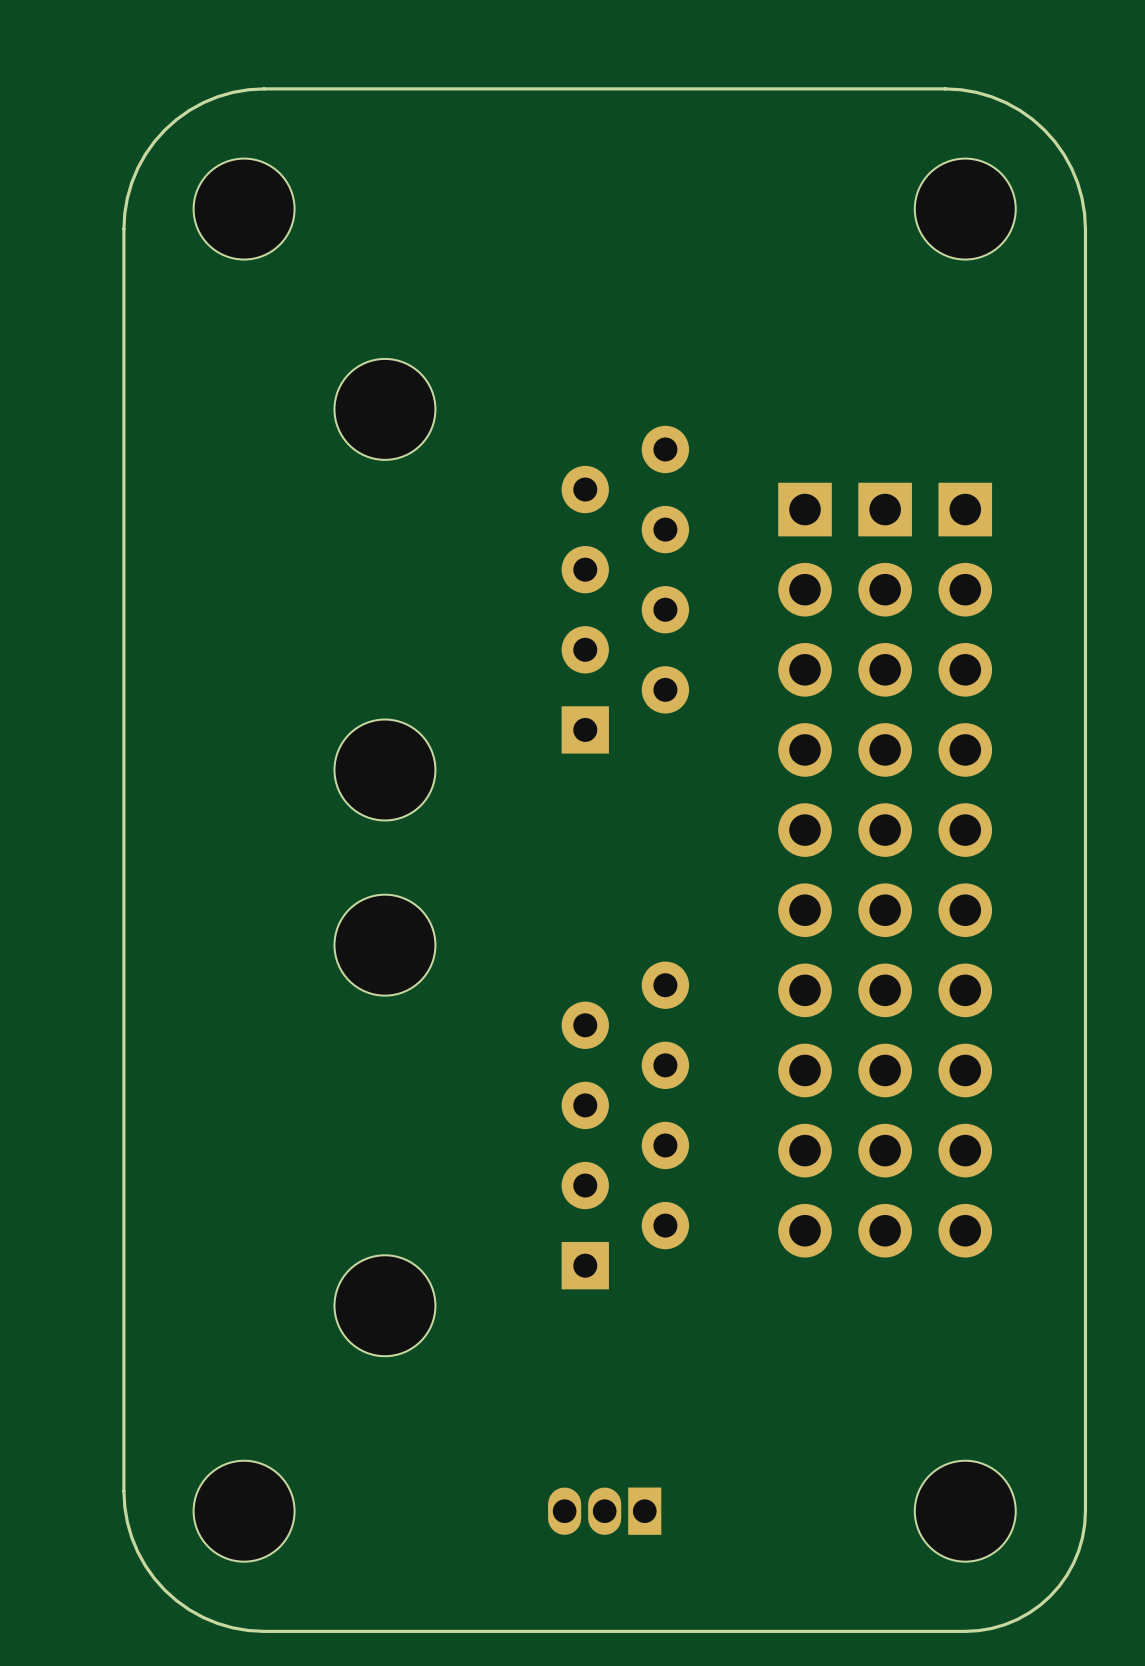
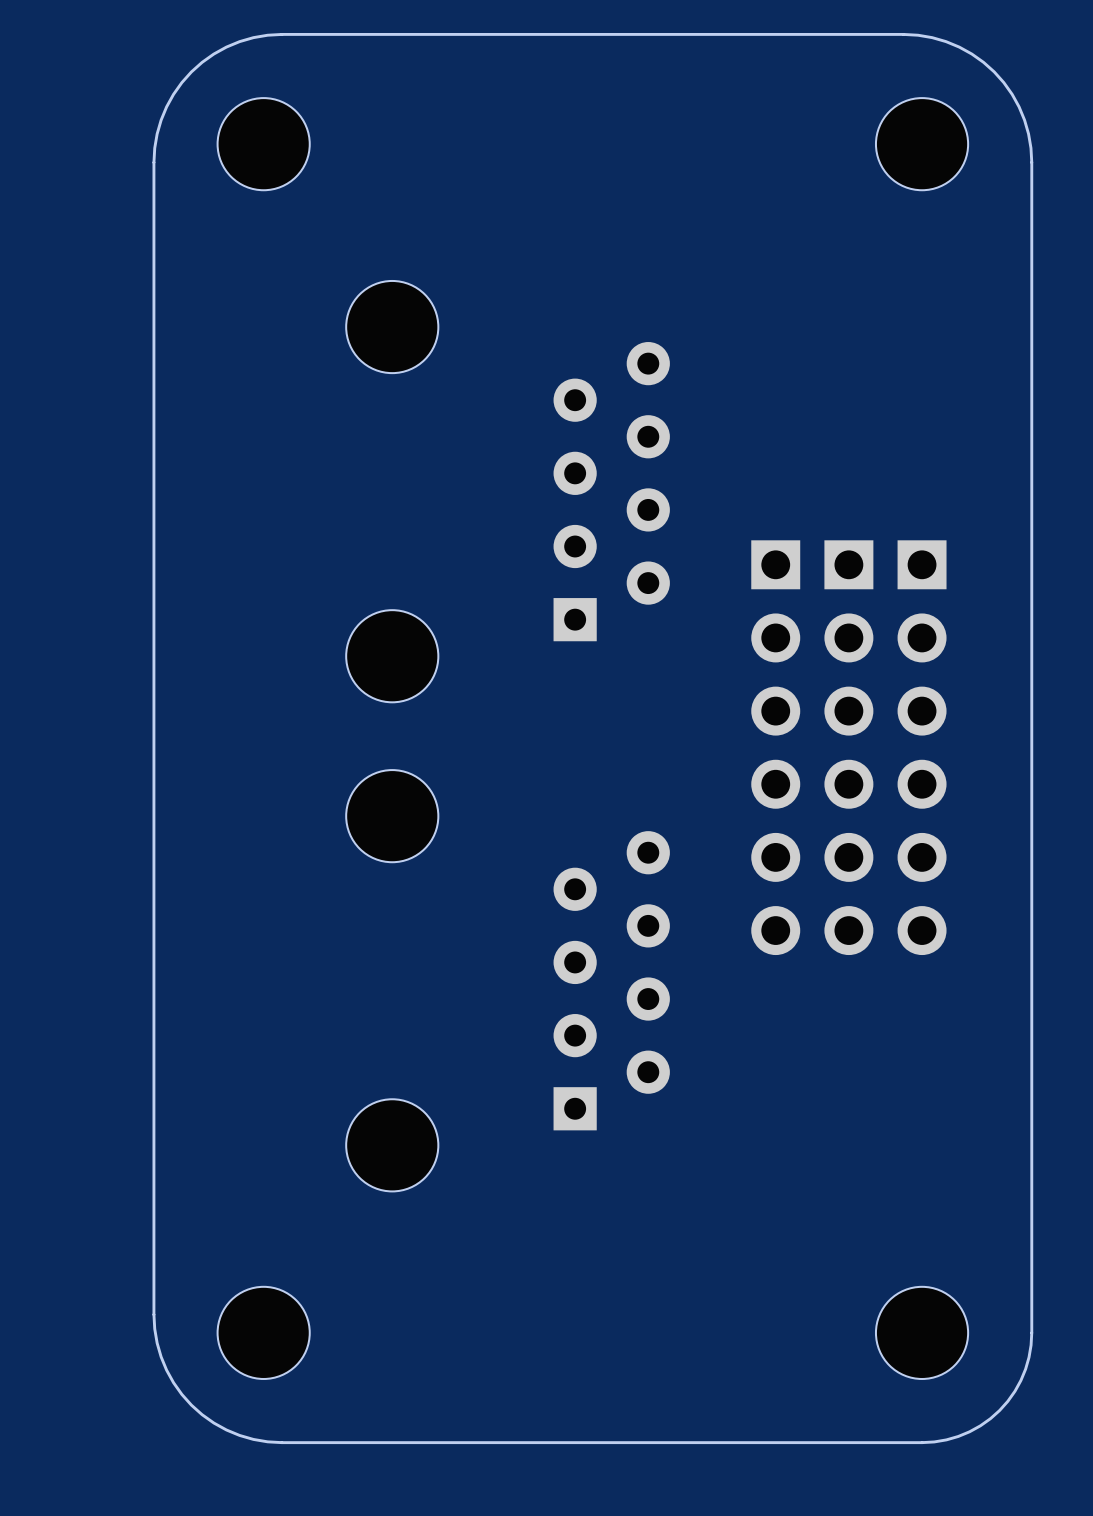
part footprint: [778, 482, 832, 1258] -> [751, 540, 801, 956]
part footprint: [858, 482, 912, 1258] -> [824, 540, 874, 956]
part footprint: [938, 482, 993, 1258] -> [897, 540, 947, 956]
part: (604, 1511) -> none

